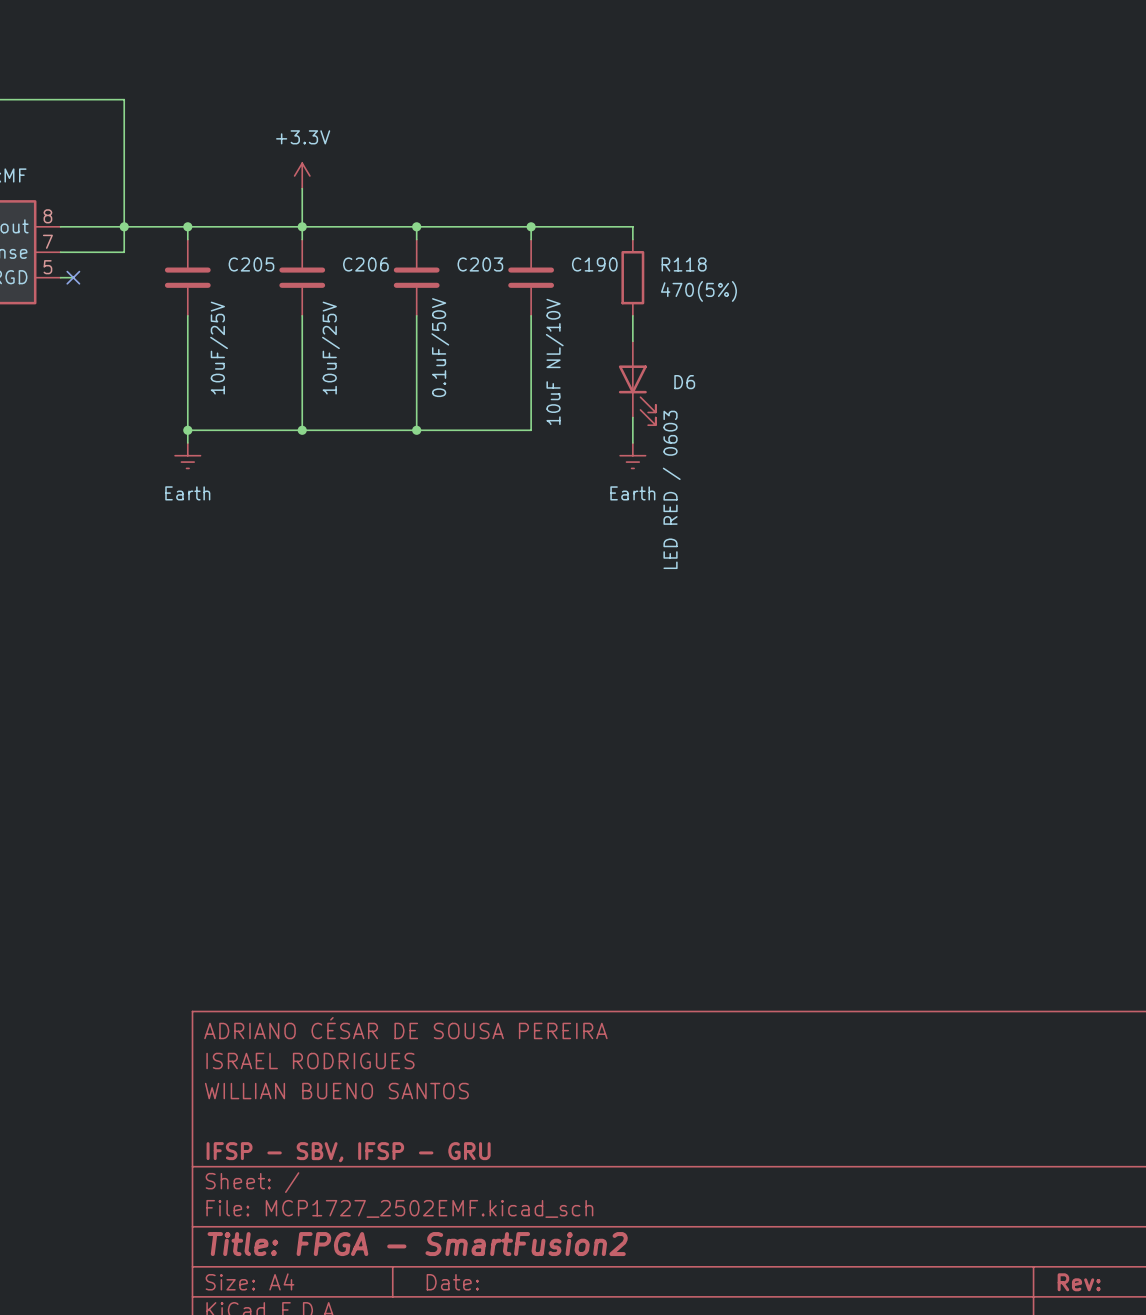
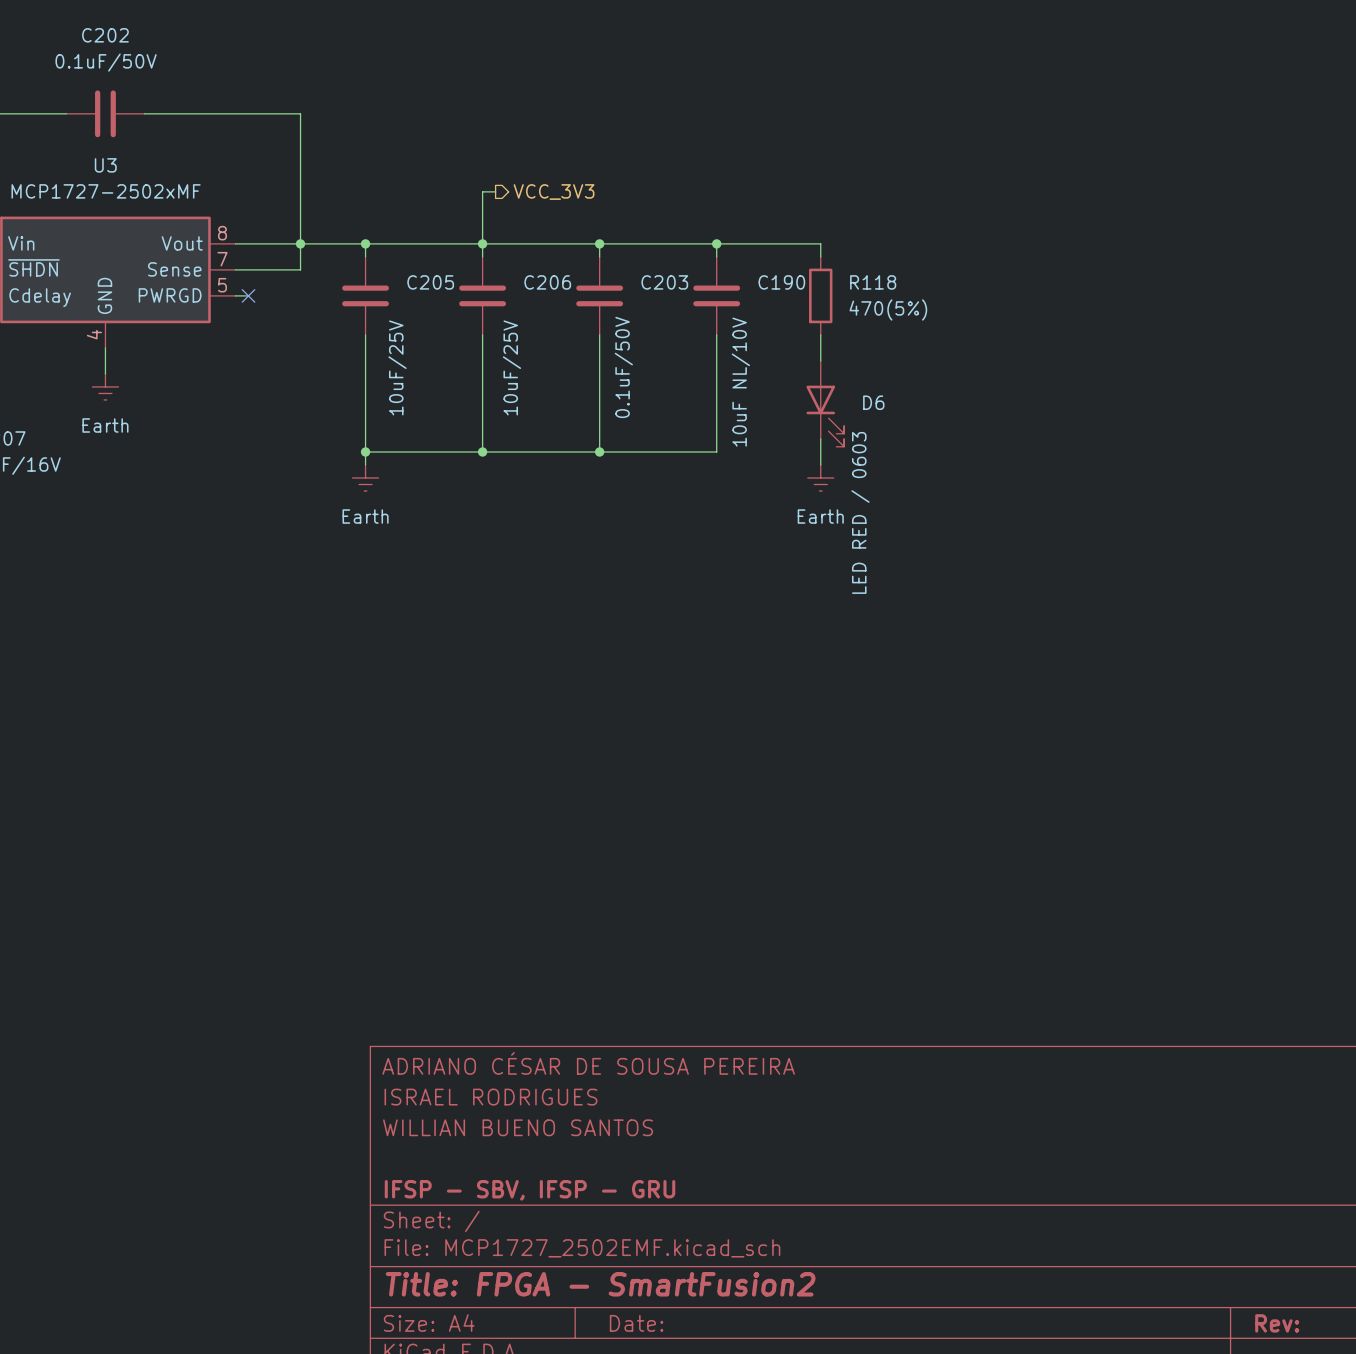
power symbol: +3.3V (302, 175) -> none
hierarchical label: none -> VCC_3V3 (554, 192)

